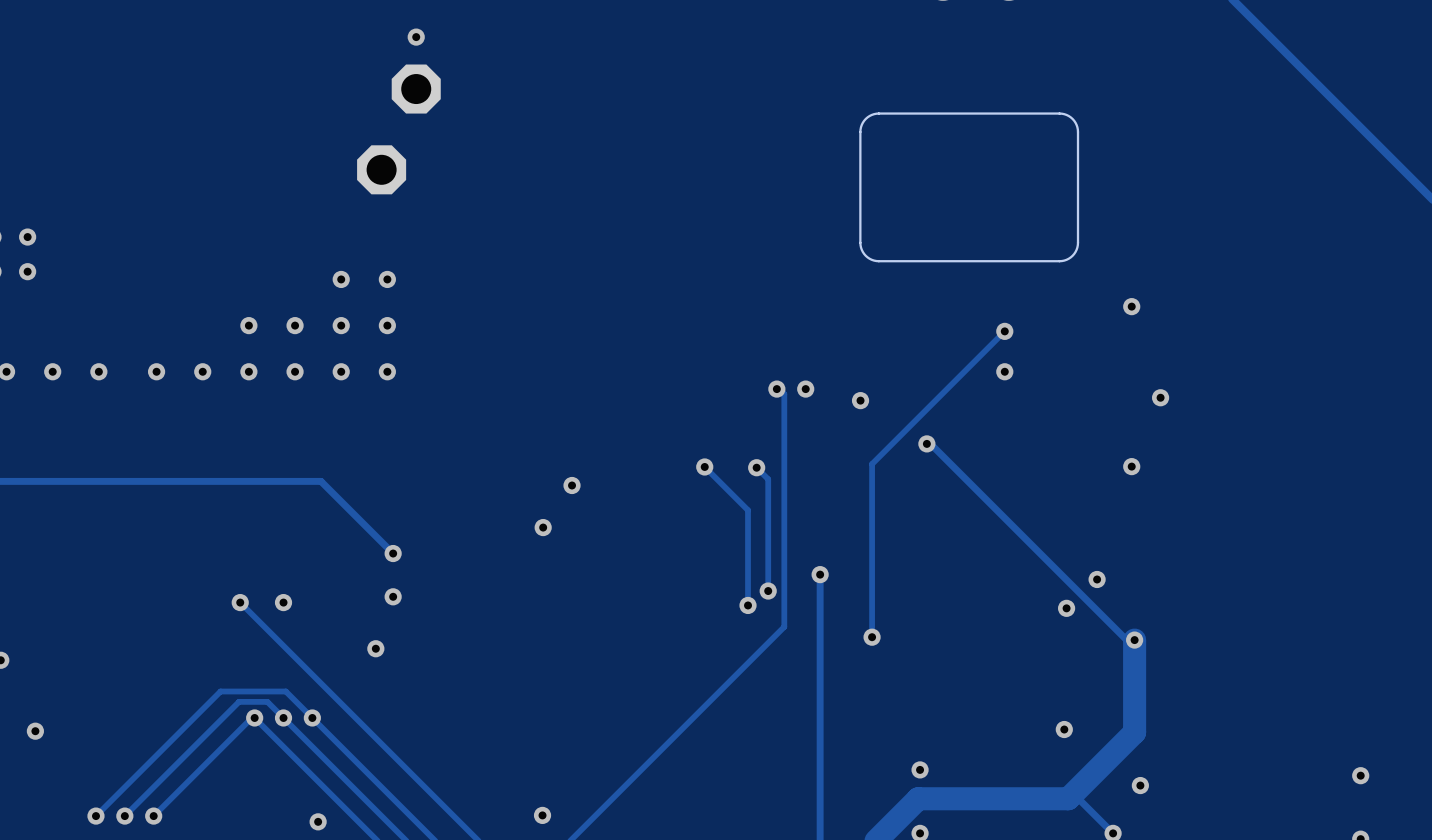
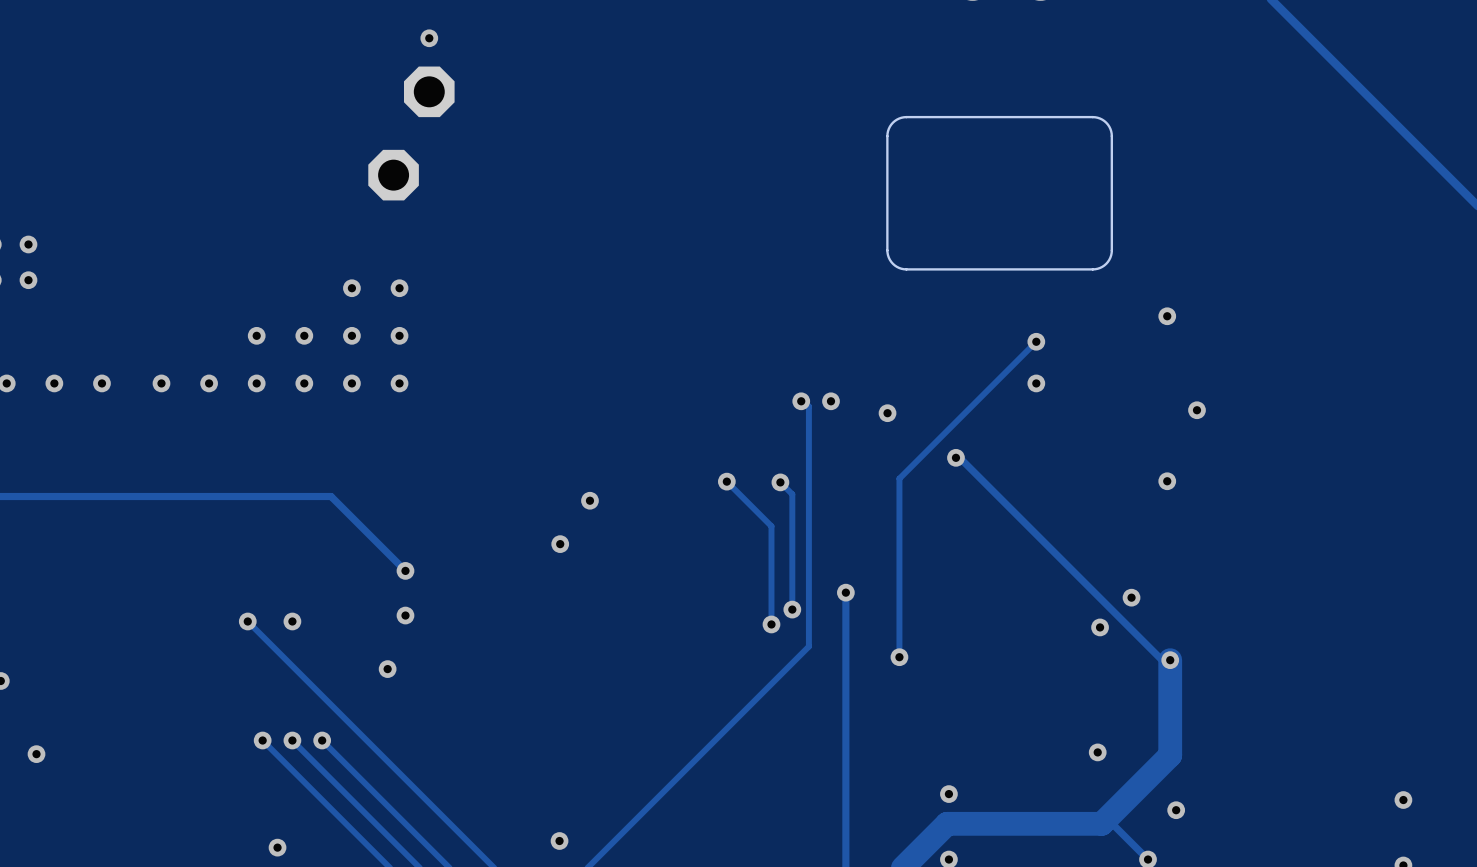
track: (254, 717) (251, 717) (153, 816) -> none
track: (283, 717) (267, 701) (239, 701) (124, 816) -> none
track: (312, 717) (285, 691) (220, 691) (95, 816) -> none
via: (95, 816) -> none
via: (124, 816) -> none
via: (153, 816) -> none
via position: (318, 821) -> (277, 847)

